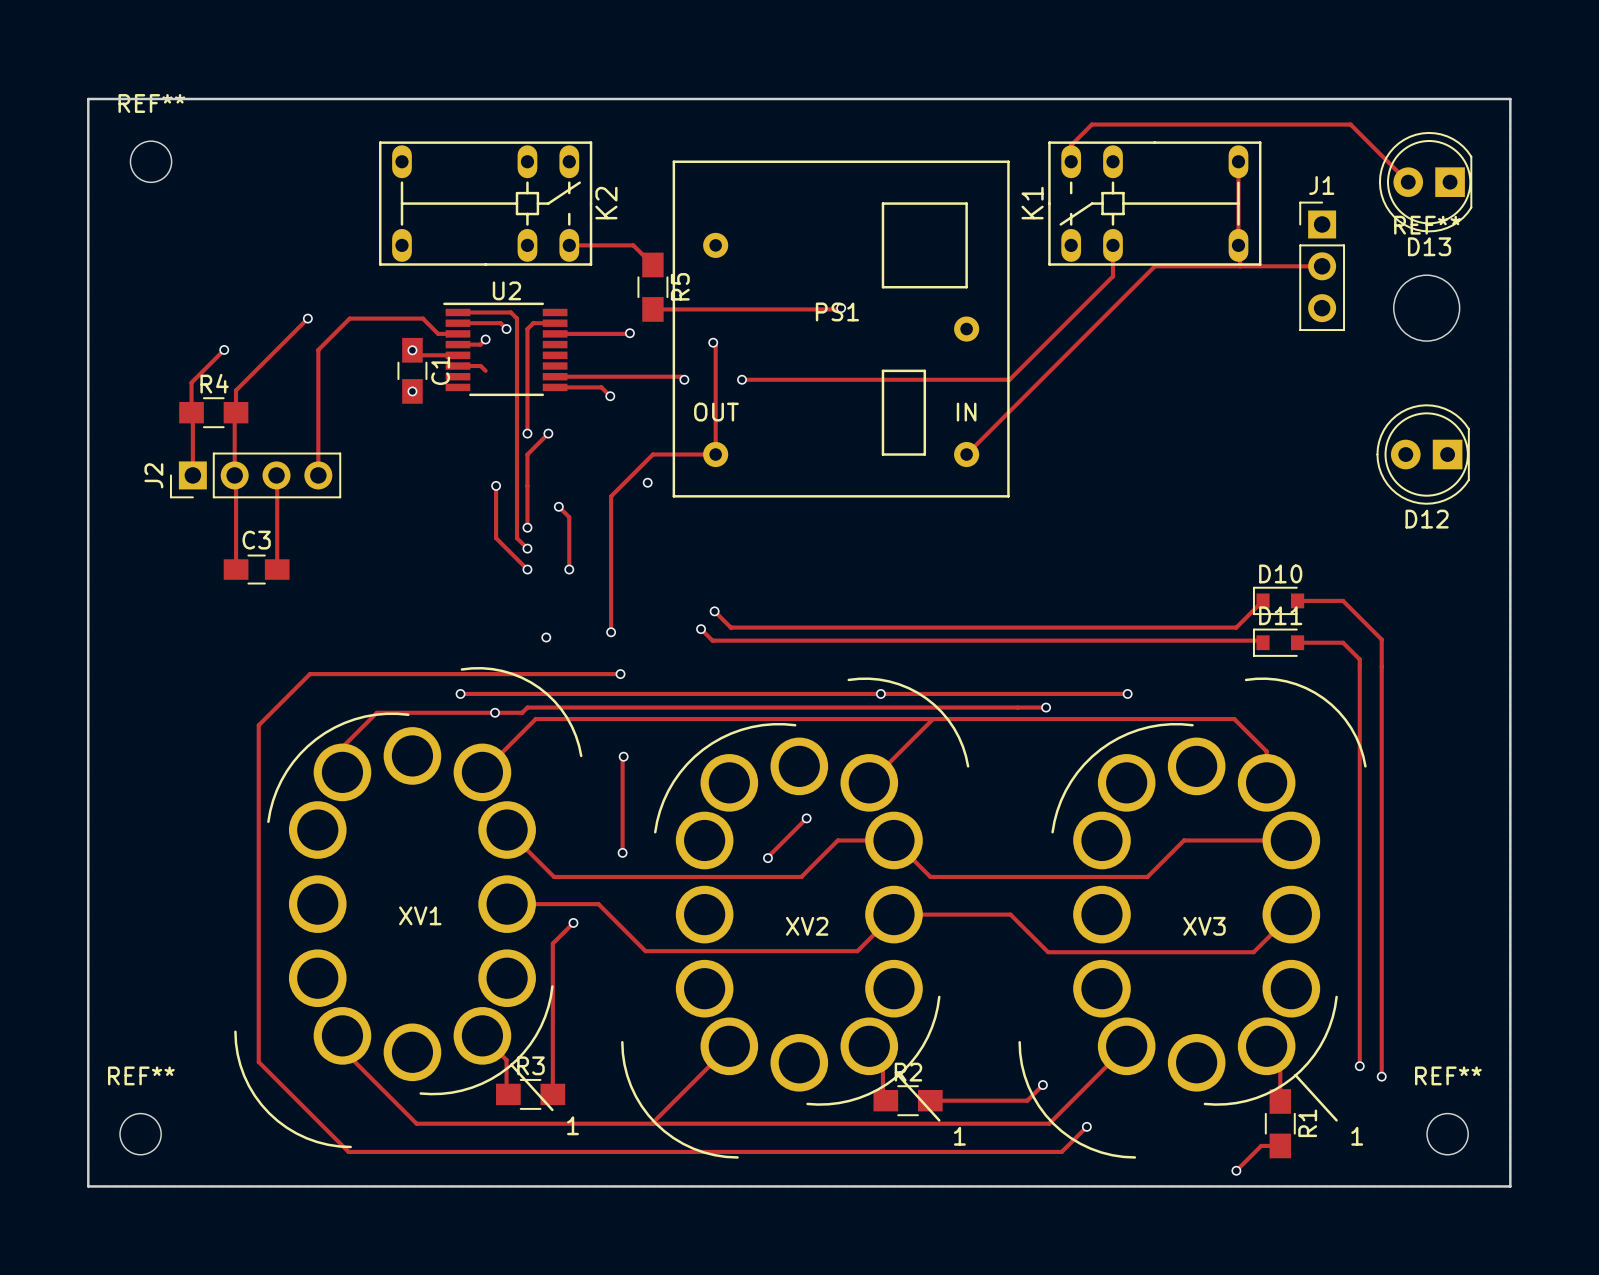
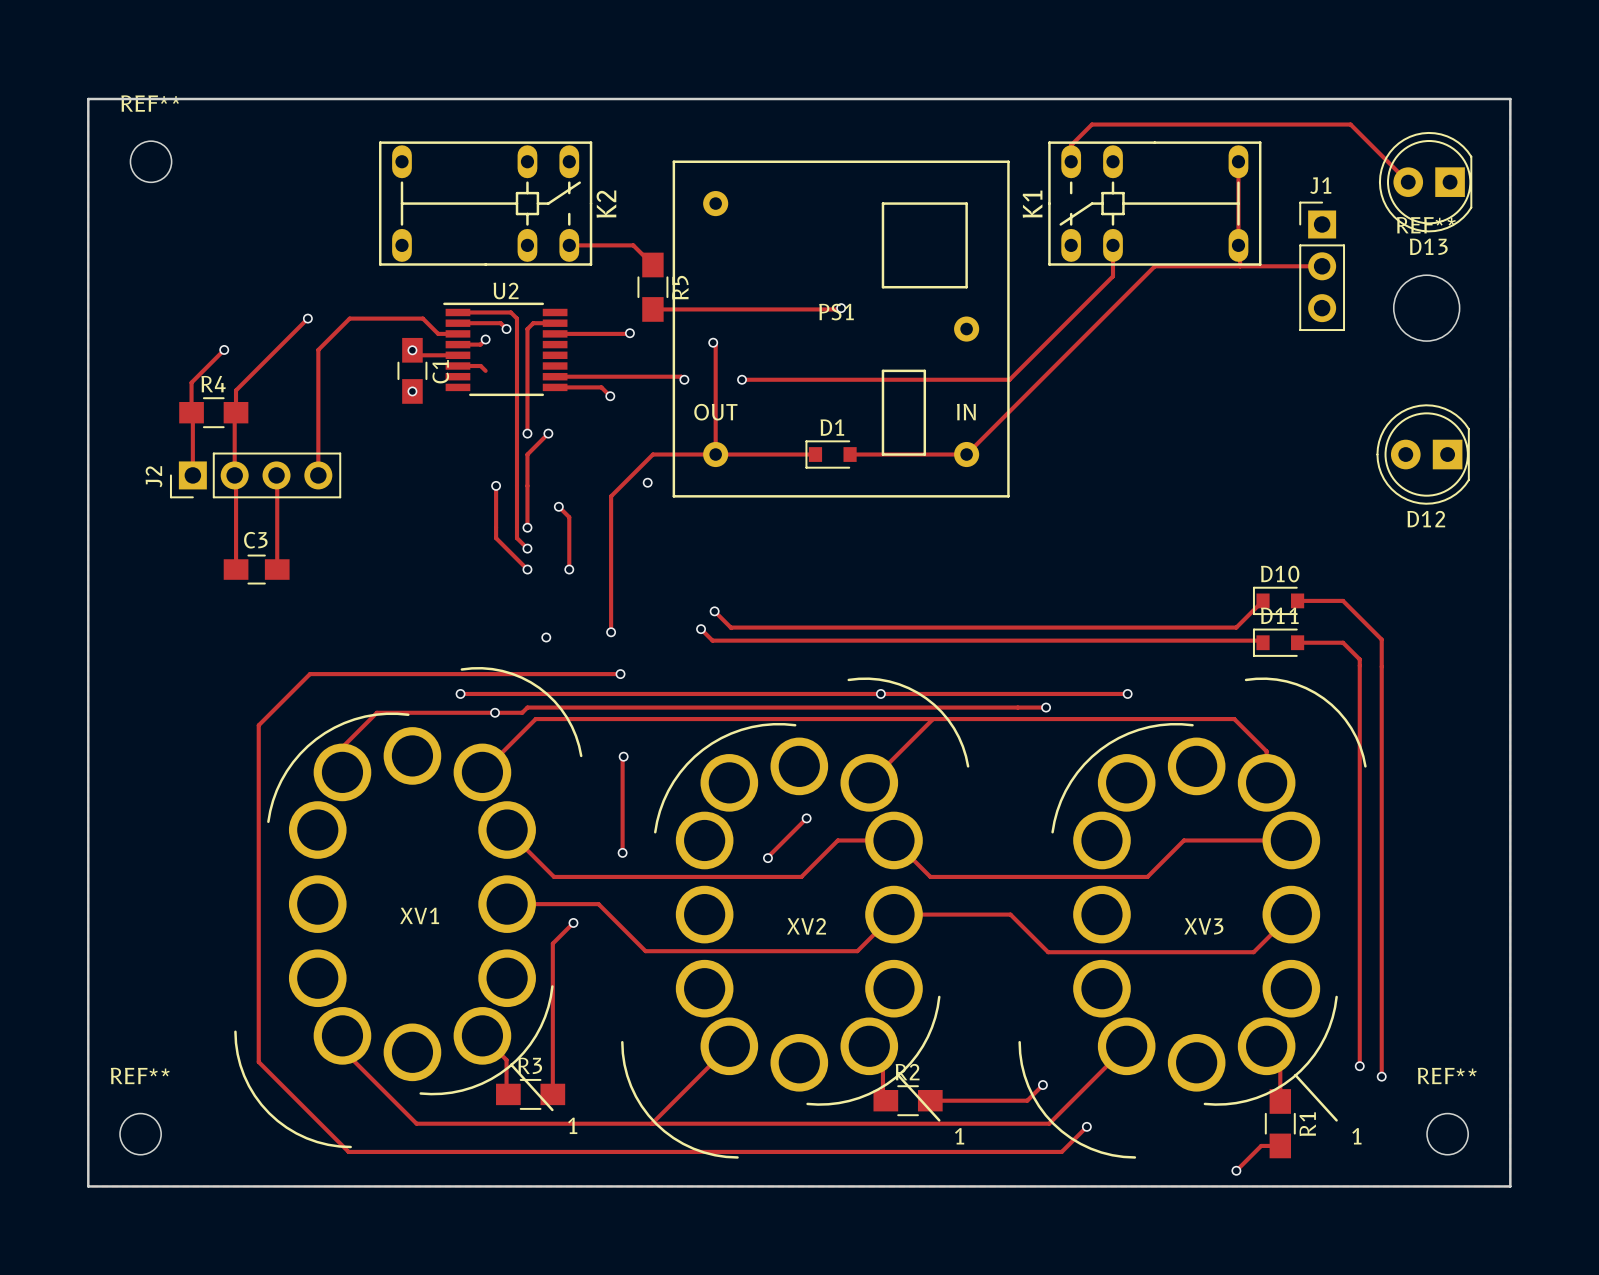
PS1 footprint: [672, 160, 1010, 498] -> [672, 160, 1010, 498]
track: none -> (715, 454) (815, 454)
D1: none -> (831, 454)
track: none -> (850, 454) (966, 454)

